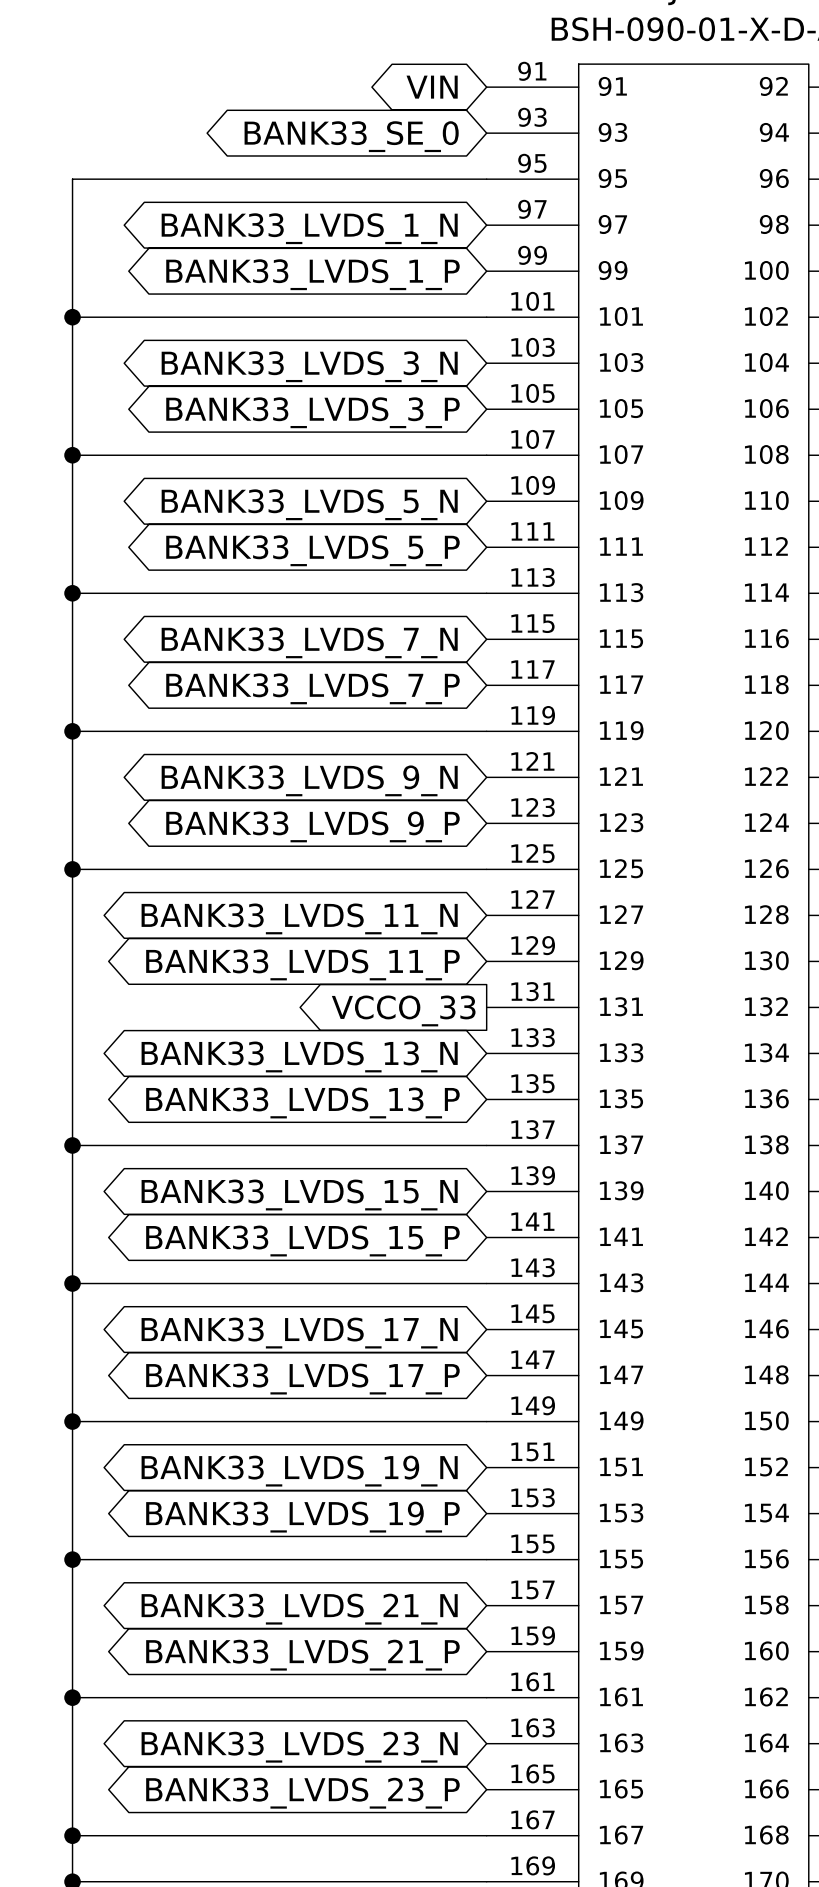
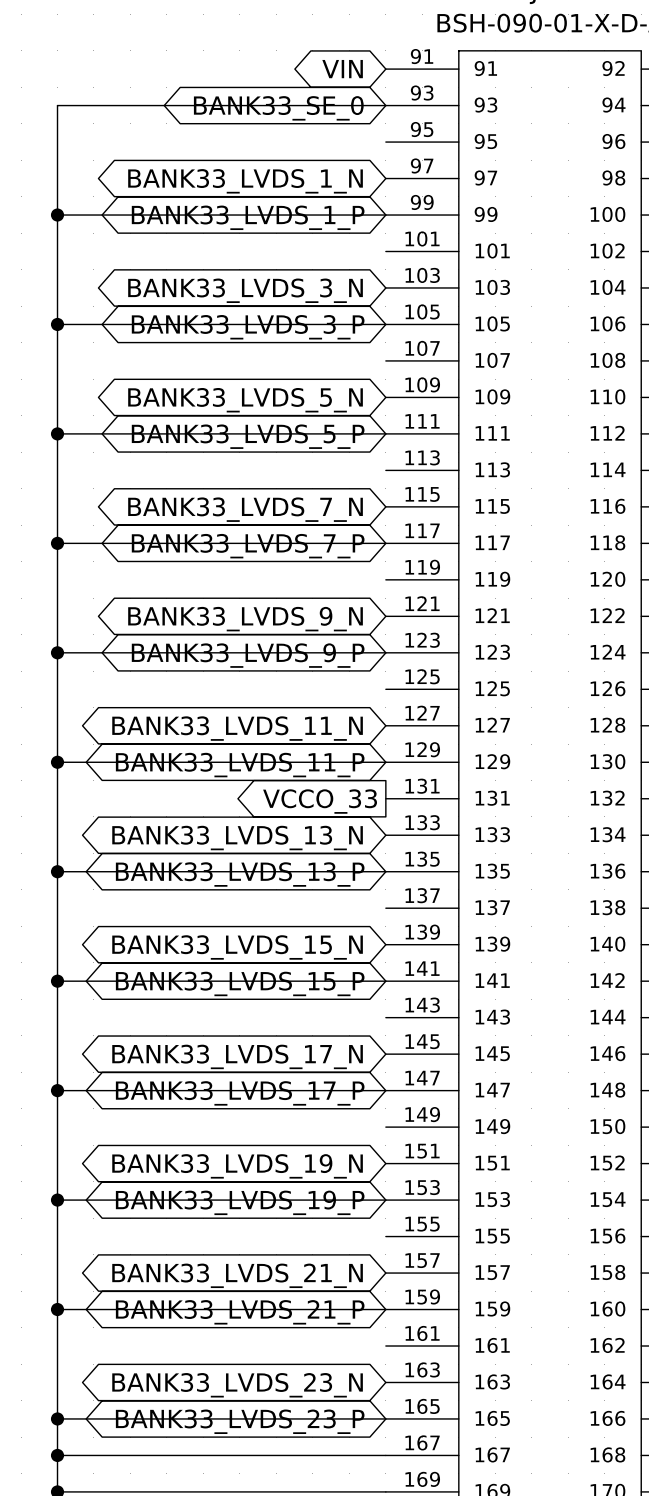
wire: (72, 179) (486, 179) -> (57, 142) (57, 105) (385, 105)
wire: none -> (57, 215) (385, 215)
junction: none -> (57, 215)
wire: (72, 317) (486, 317) -> (57, 324) (385, 324)
junction: (72, 317) -> none
junction: none -> (57, 324)
wire: (72, 455) (486, 455) -> (57, 433) (385, 433)
junction: (72, 455) -> none
junction: none -> (57, 433)
wire: (72, 593) (486, 593) -> (57, 543) (385, 543)
junction: (72, 593) -> none
junction: none -> (57, 543)
wire: (72, 731) (486, 731) -> (57, 652) (385, 652)
junction: (72, 731) -> none
junction: none -> (57, 652)
wire: (72, 869) (486, 869) -> (57, 762) (385, 762)
junction: (72, 869) -> none
junction: none -> (57, 762)
wire: none -> (57, 871) (385, 871)
junction: none -> (57, 871)
wire: (72, 1145) (486, 1145) -> (57, 981) (385, 981)
junction: (72, 1145) -> none
junction: none -> (57, 981)
wire: (72, 1283) (486, 1283) -> (57, 1090) (385, 1090)
junction: (72, 1283) -> none
junction: none -> (57, 1090)
wire: (72, 1421) (486, 1421) -> (57, 1200) (385, 1200)
junction: (72, 1421) -> none
junction: none -> (57, 1200)
wire: (72, 1559) (486, 1559) -> (57, 1309) (385, 1309)
junction: (72, 1559) -> none
junction: none -> (57, 1309)
wire: (72, 1697) (486, 1697) -> (57, 1418) (385, 1418)
junction: (72, 1697) -> none
junction: none -> (57, 1418)

